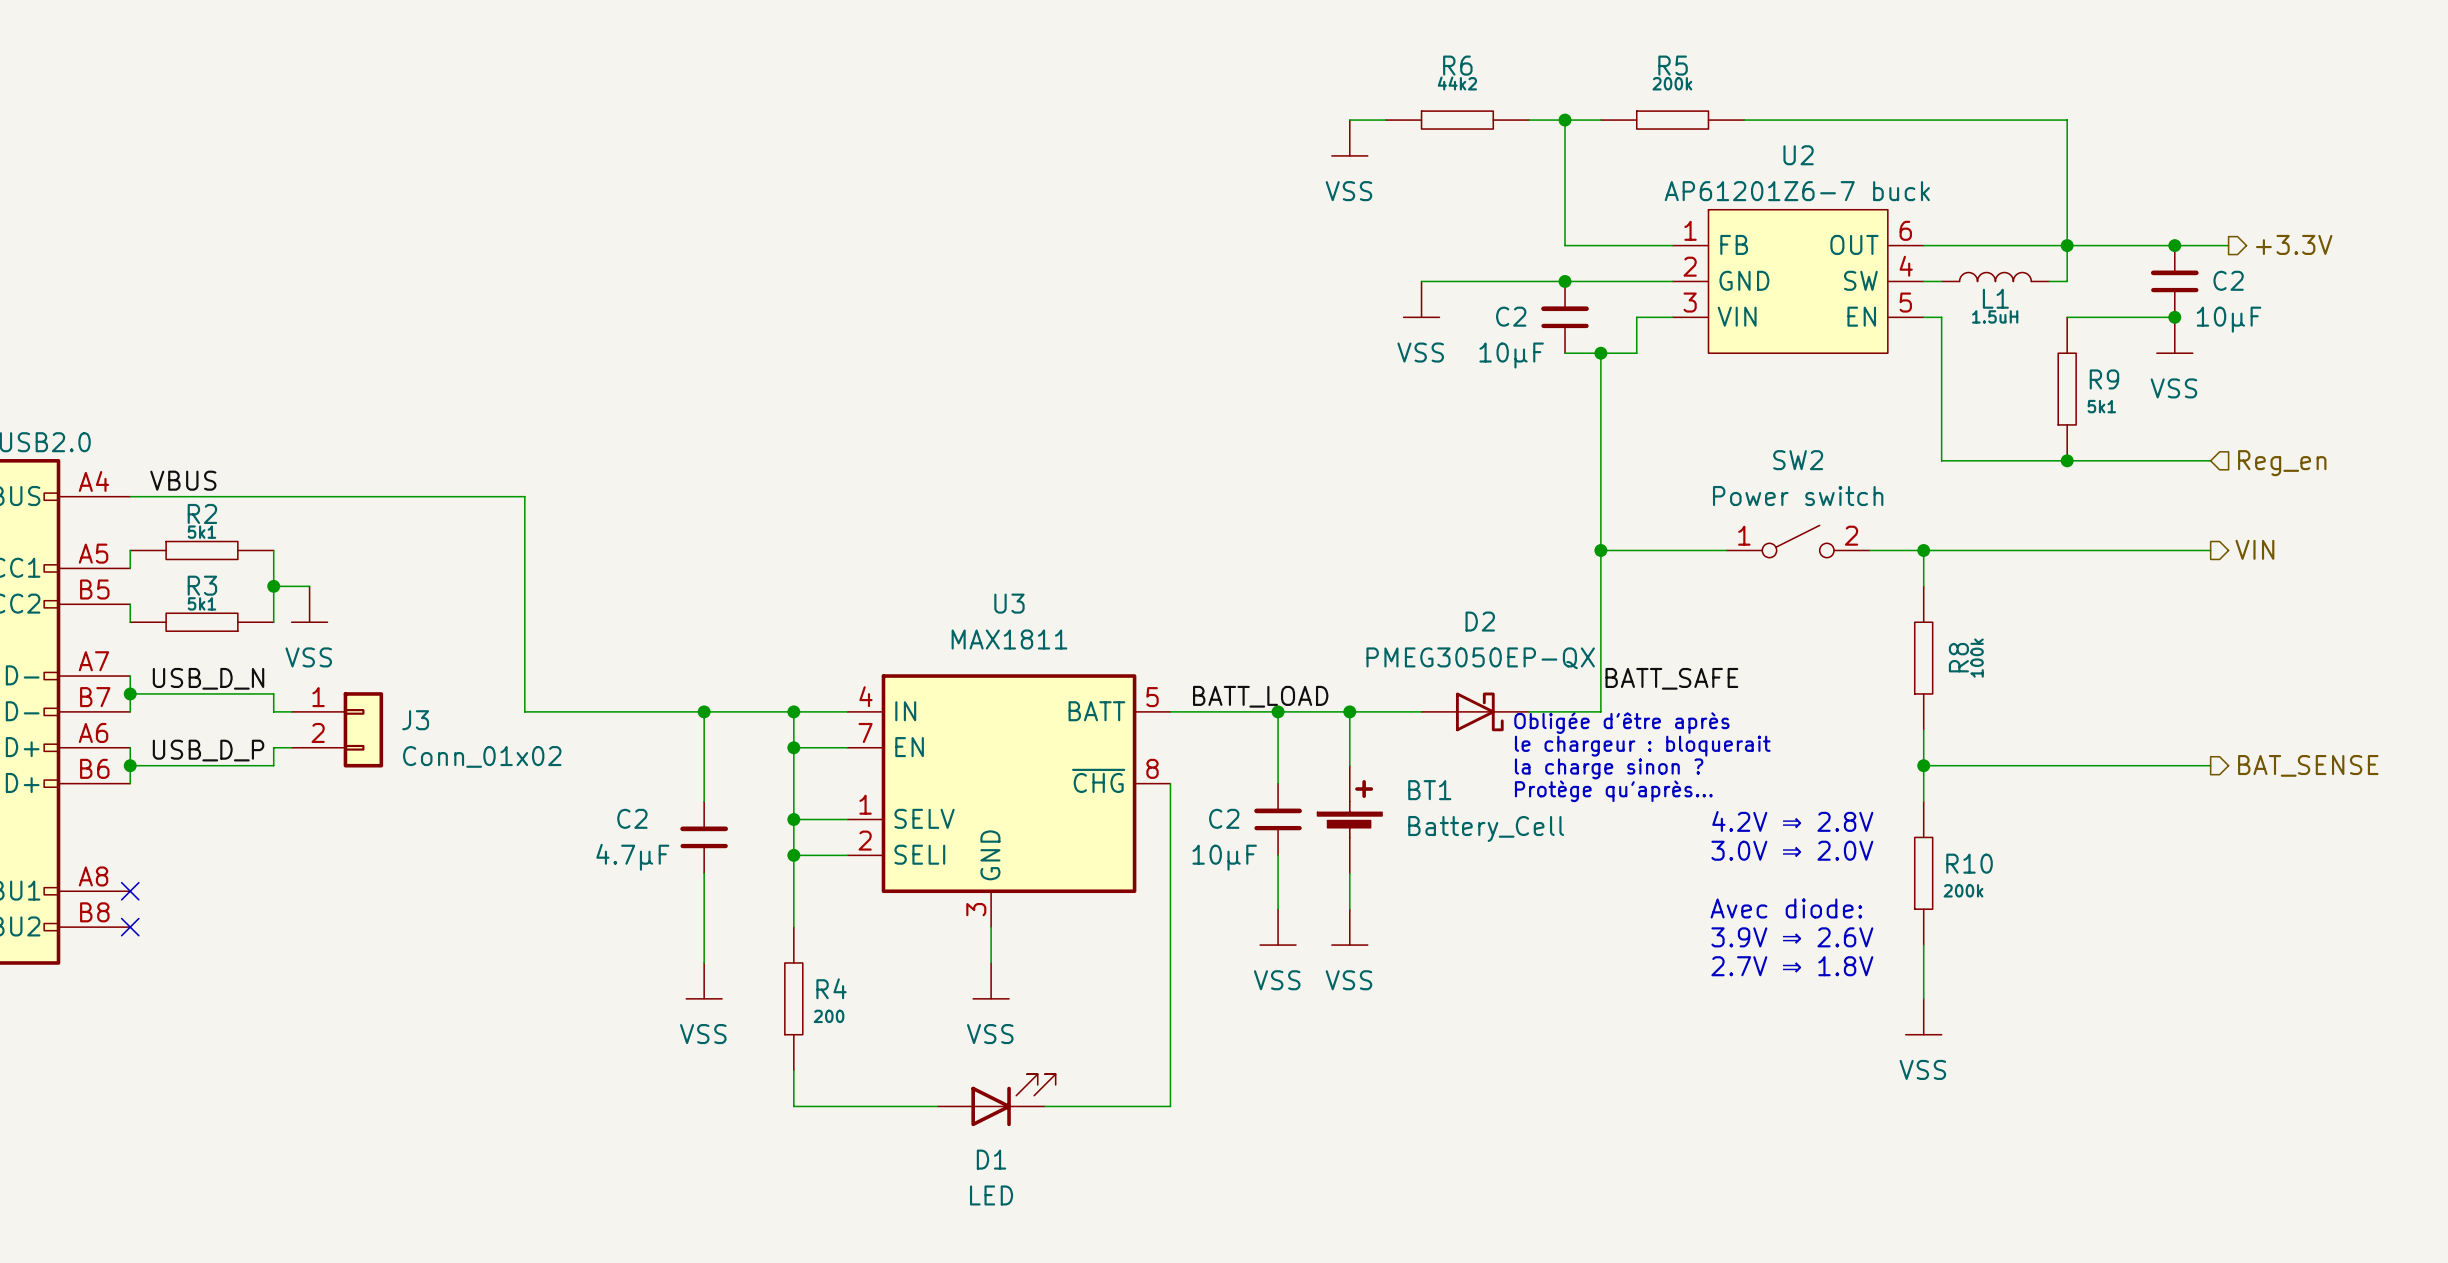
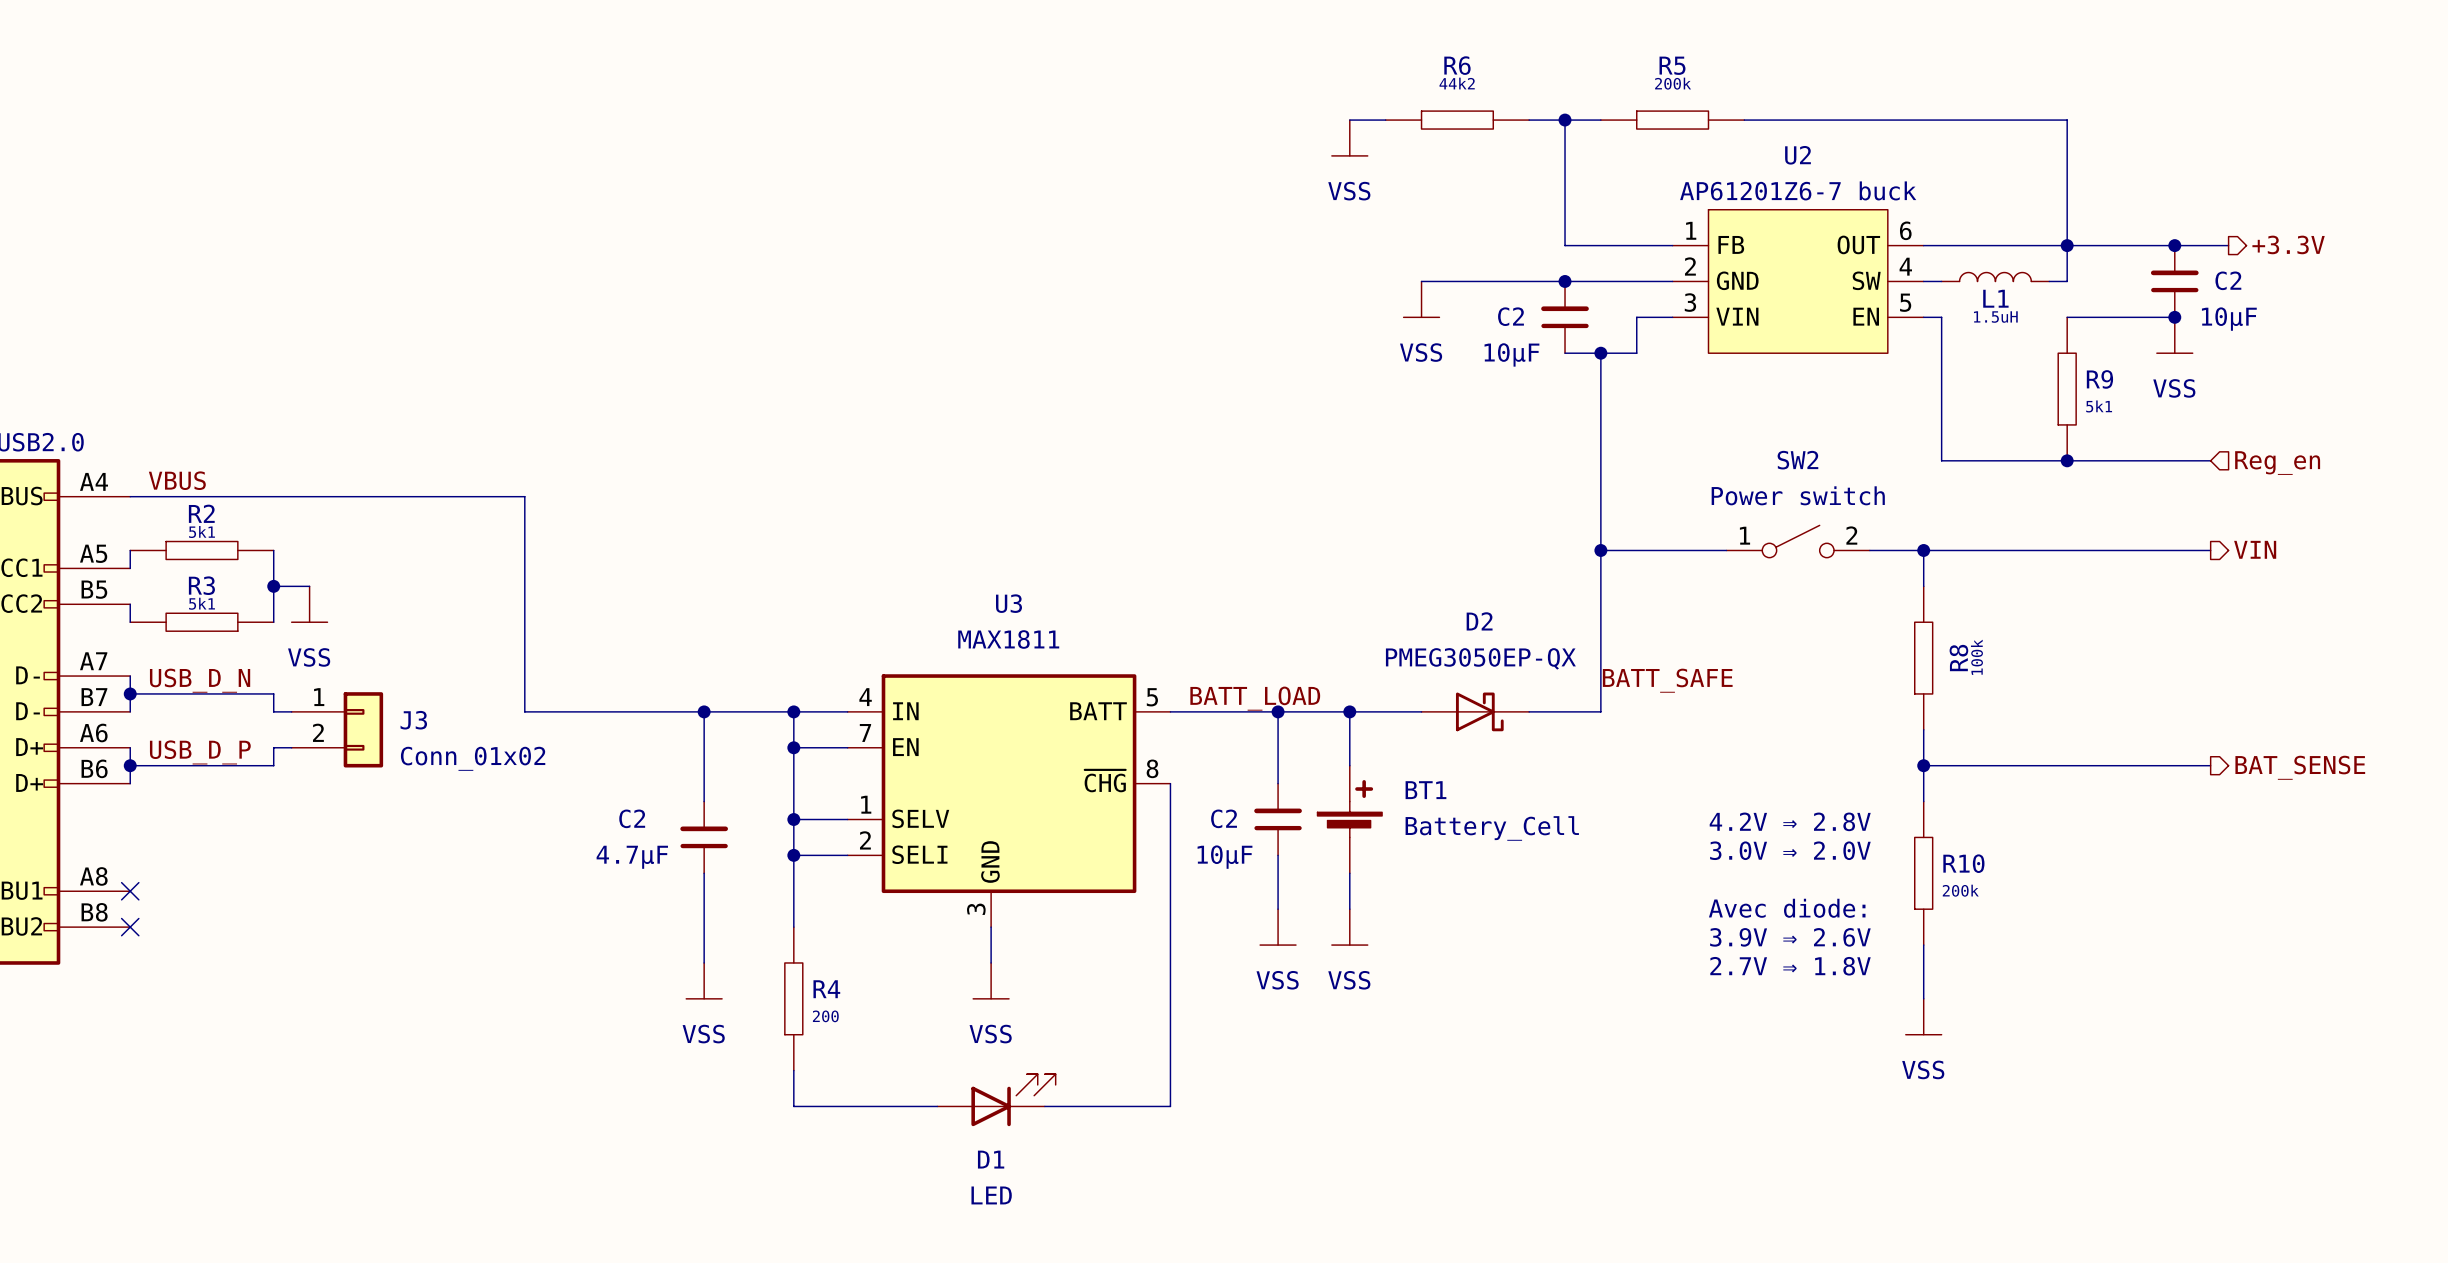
text: Obligée d'être après (1621, 723) -> none
text: le chargeur : bloquerait (1642, 746) -> none
text: la charge sinon ? (1609, 768) -> none
text: Protège qu'après... (1613, 791) -> none

